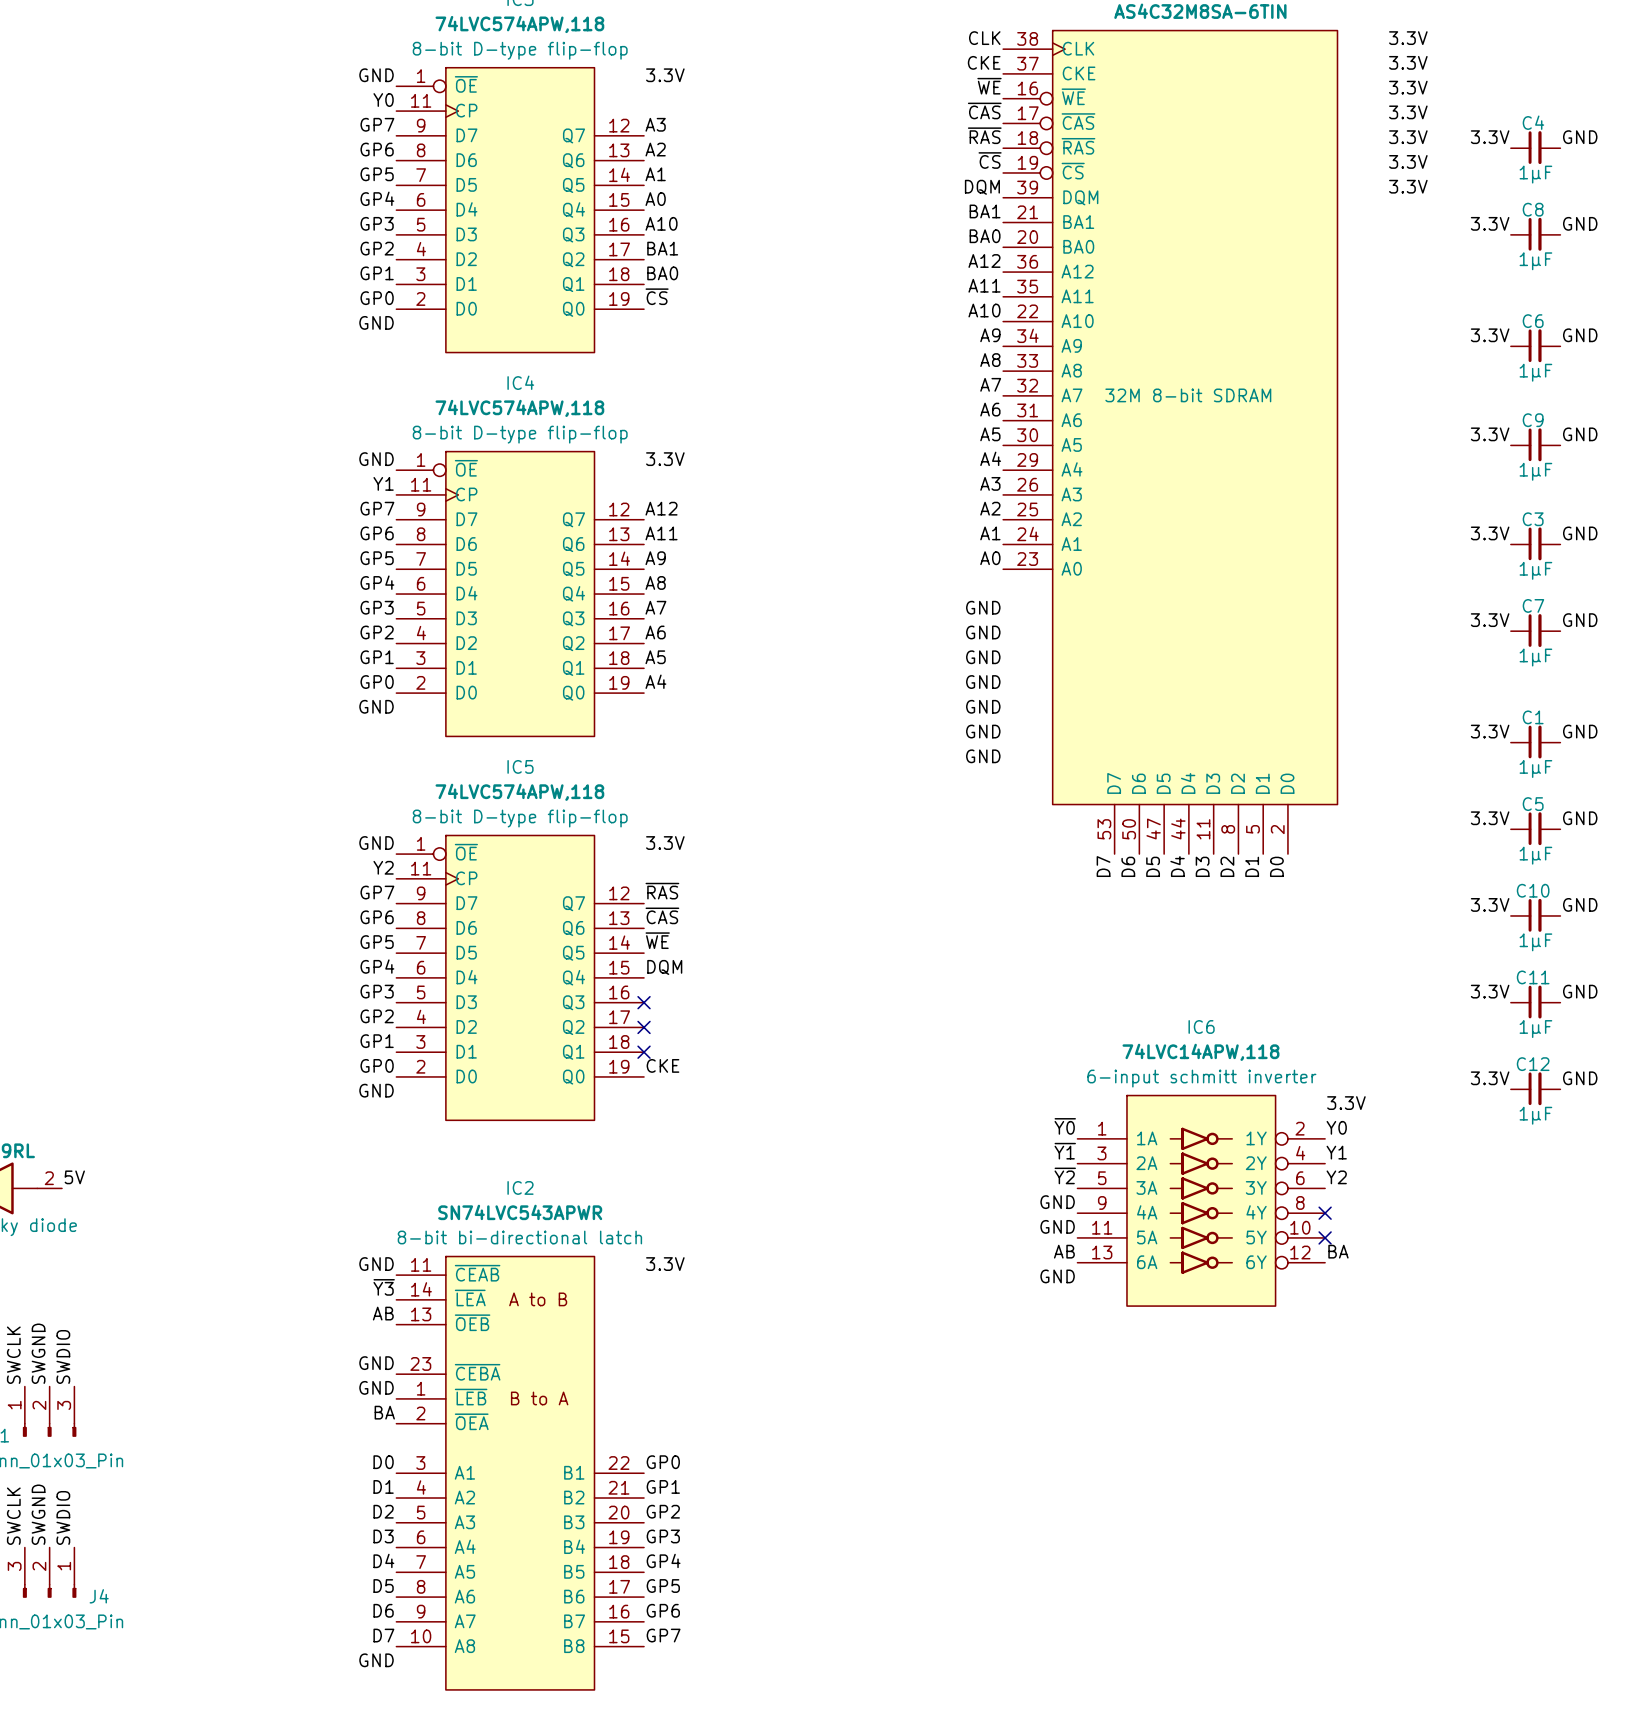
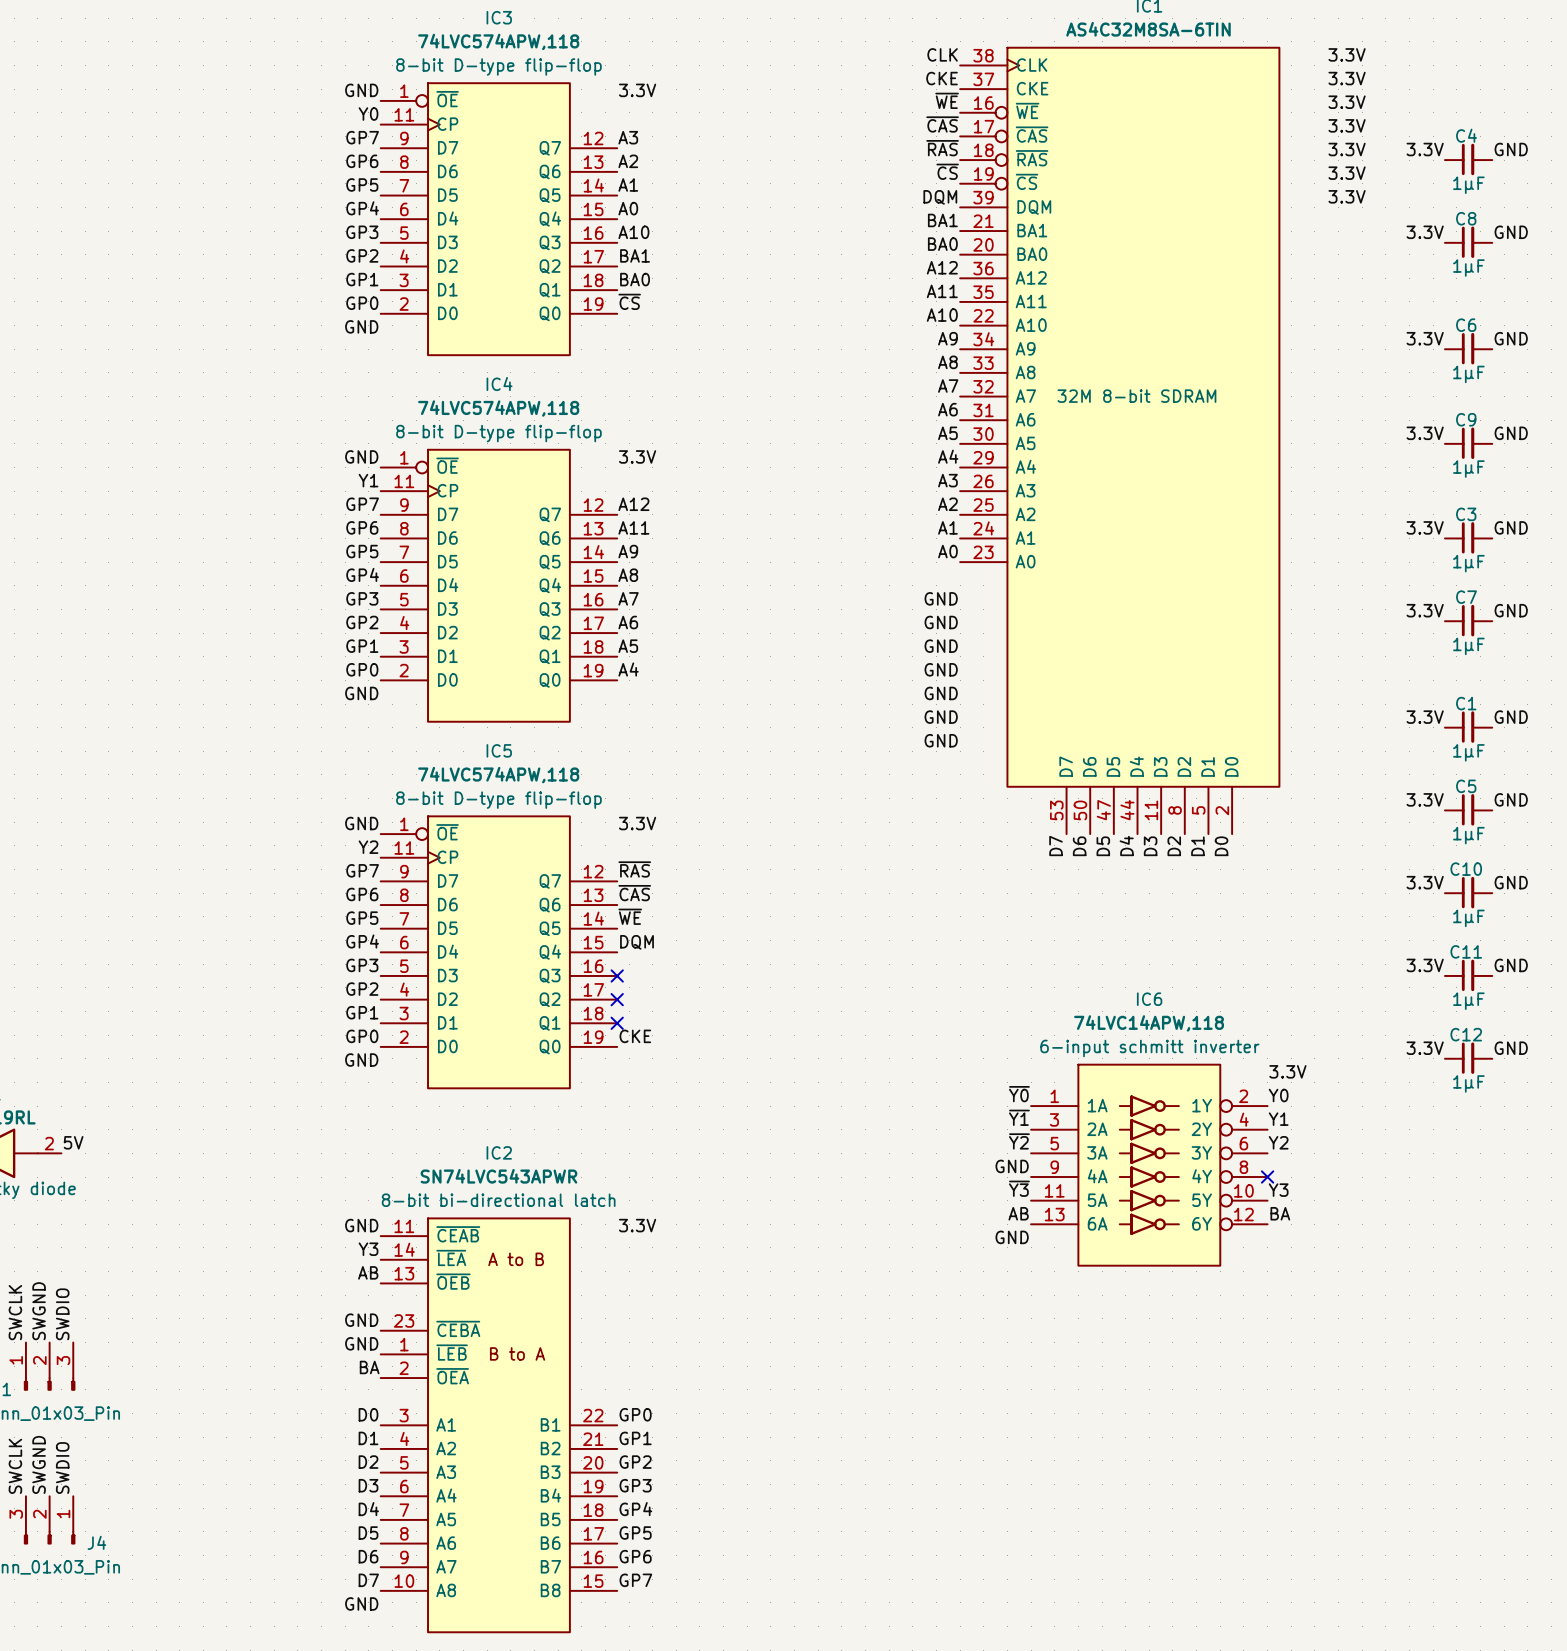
label: GND (1057, 1226) -> ~{Y3} (1019, 1188)
label: none -> Y3 (1278, 1190)
no-connect mark: (1325, 1237) -> none
label: ~{Y3} (384, 1287) -> Y3 (368, 1249)

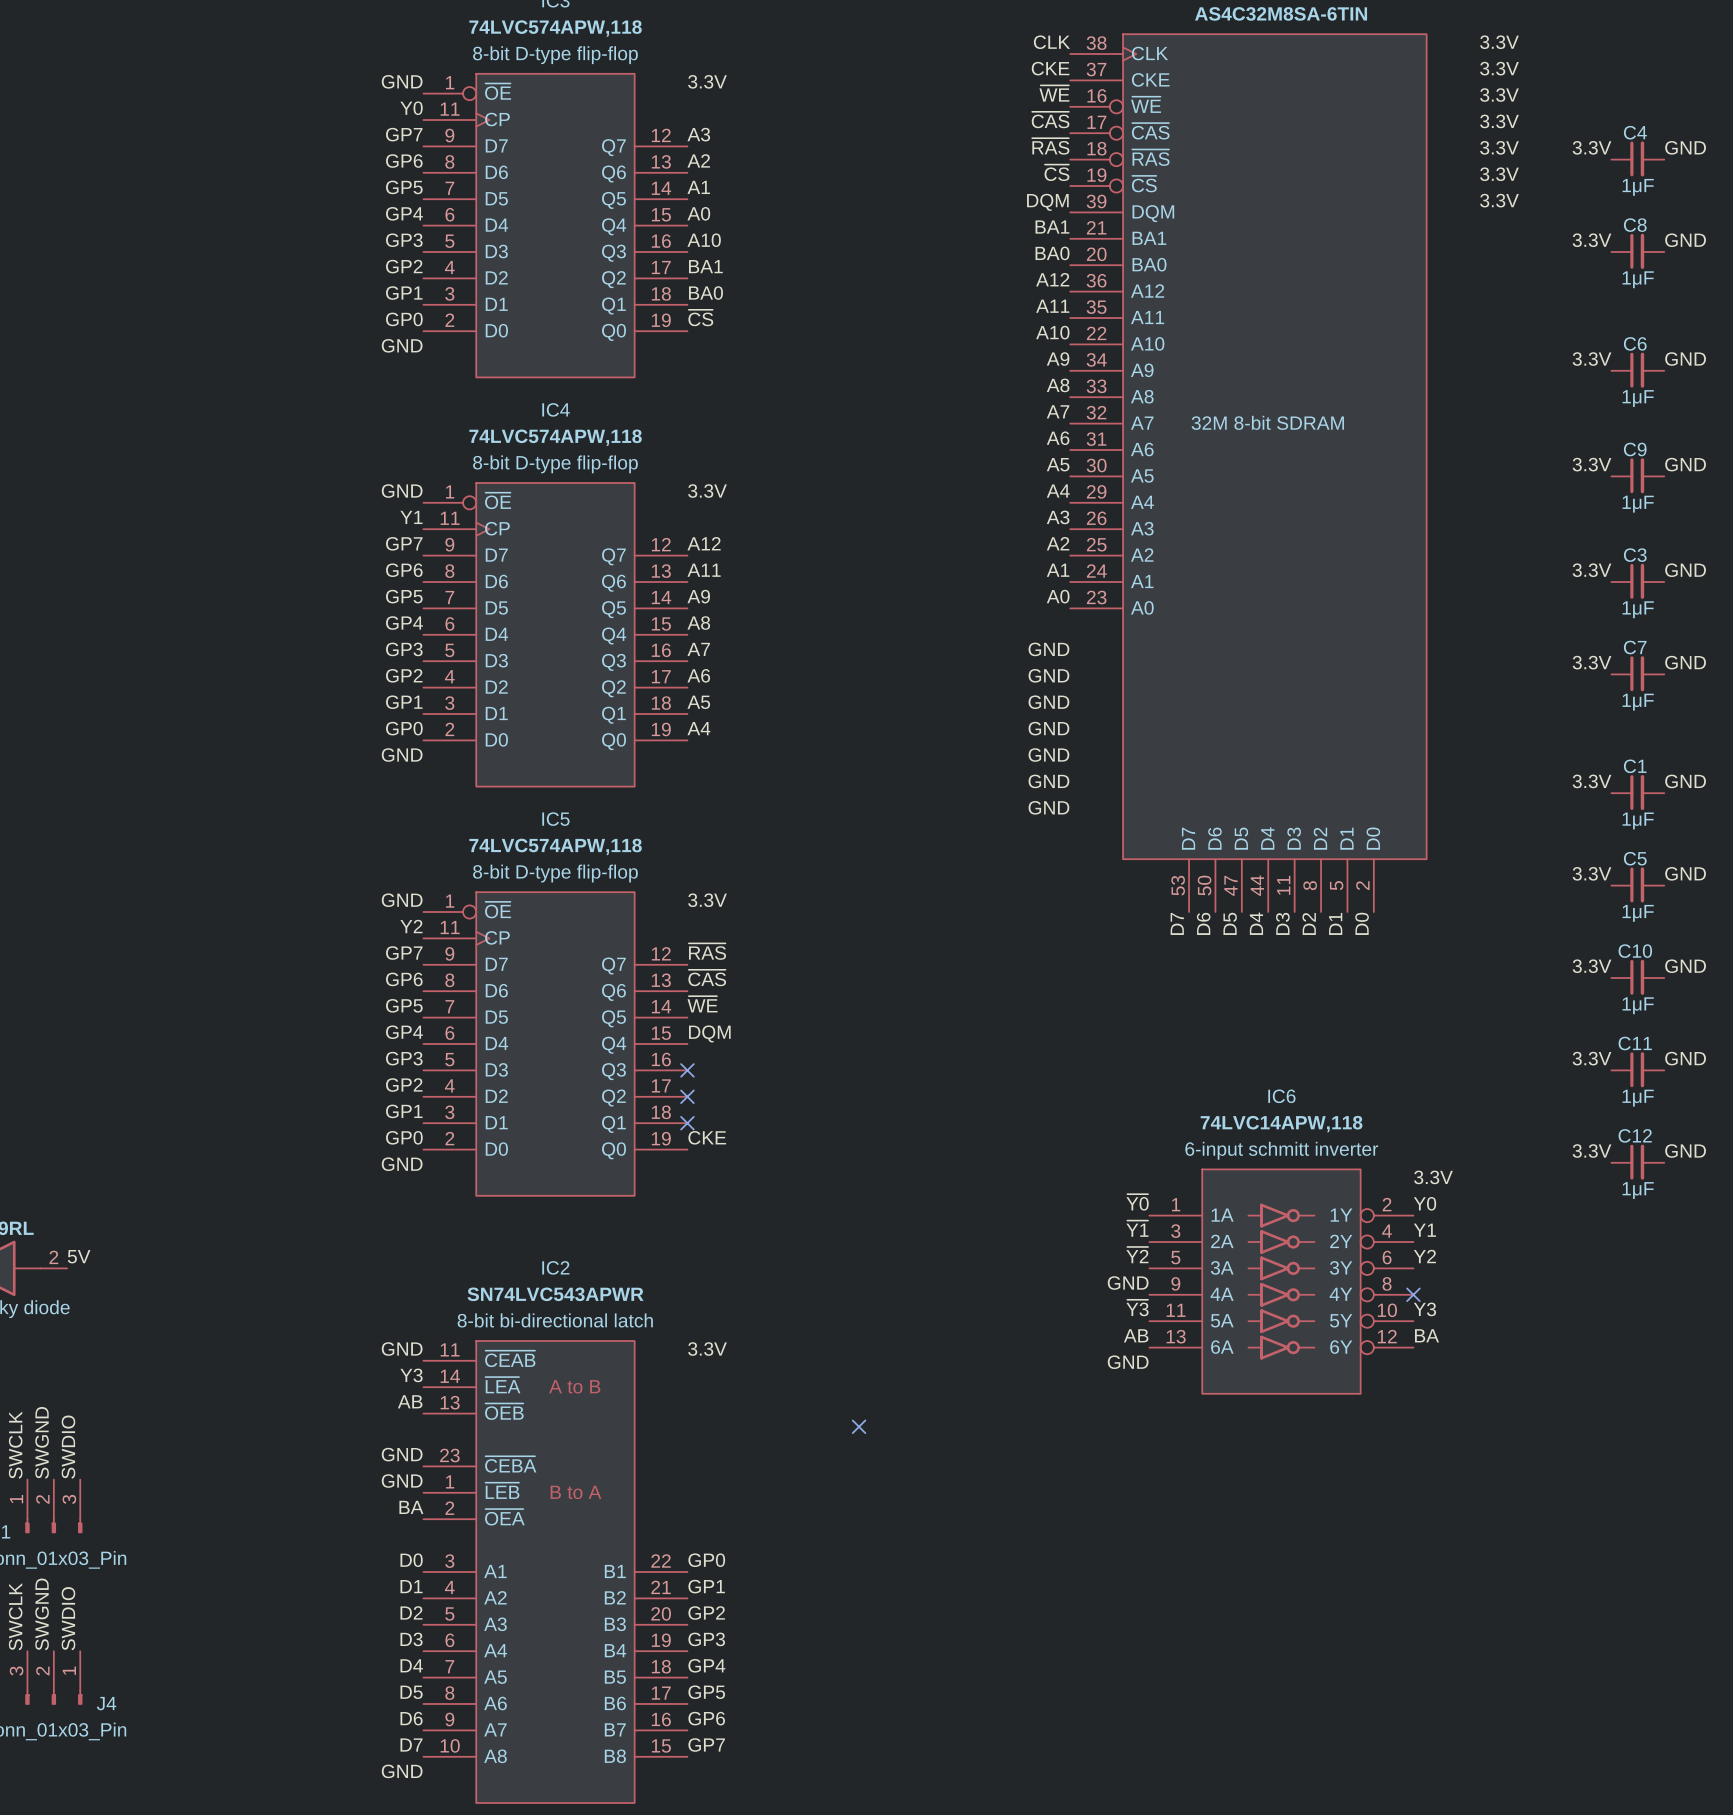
no-connect mark: none -> (859, 1426)

